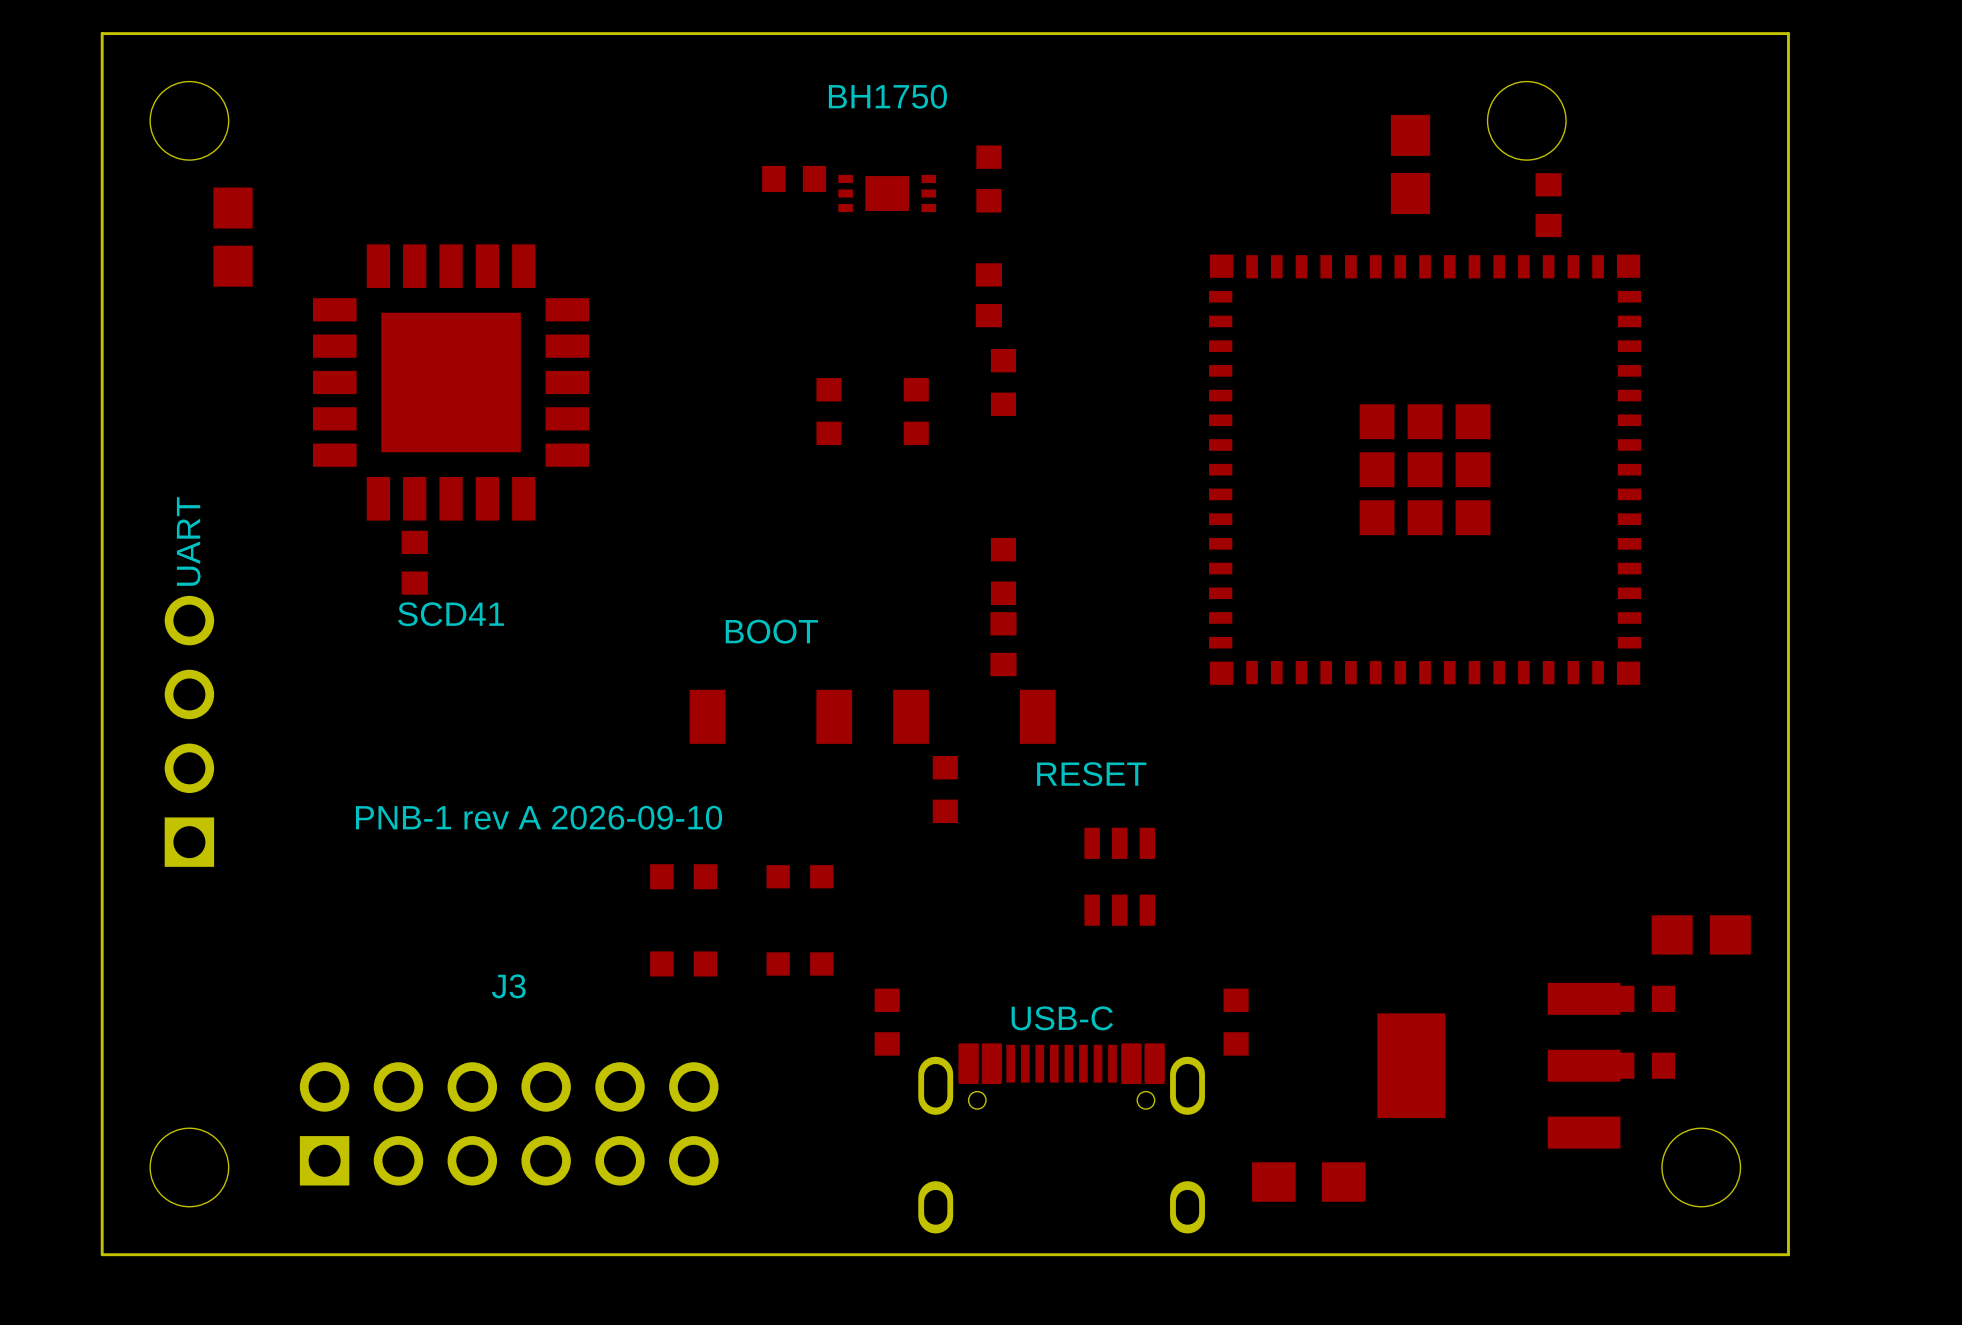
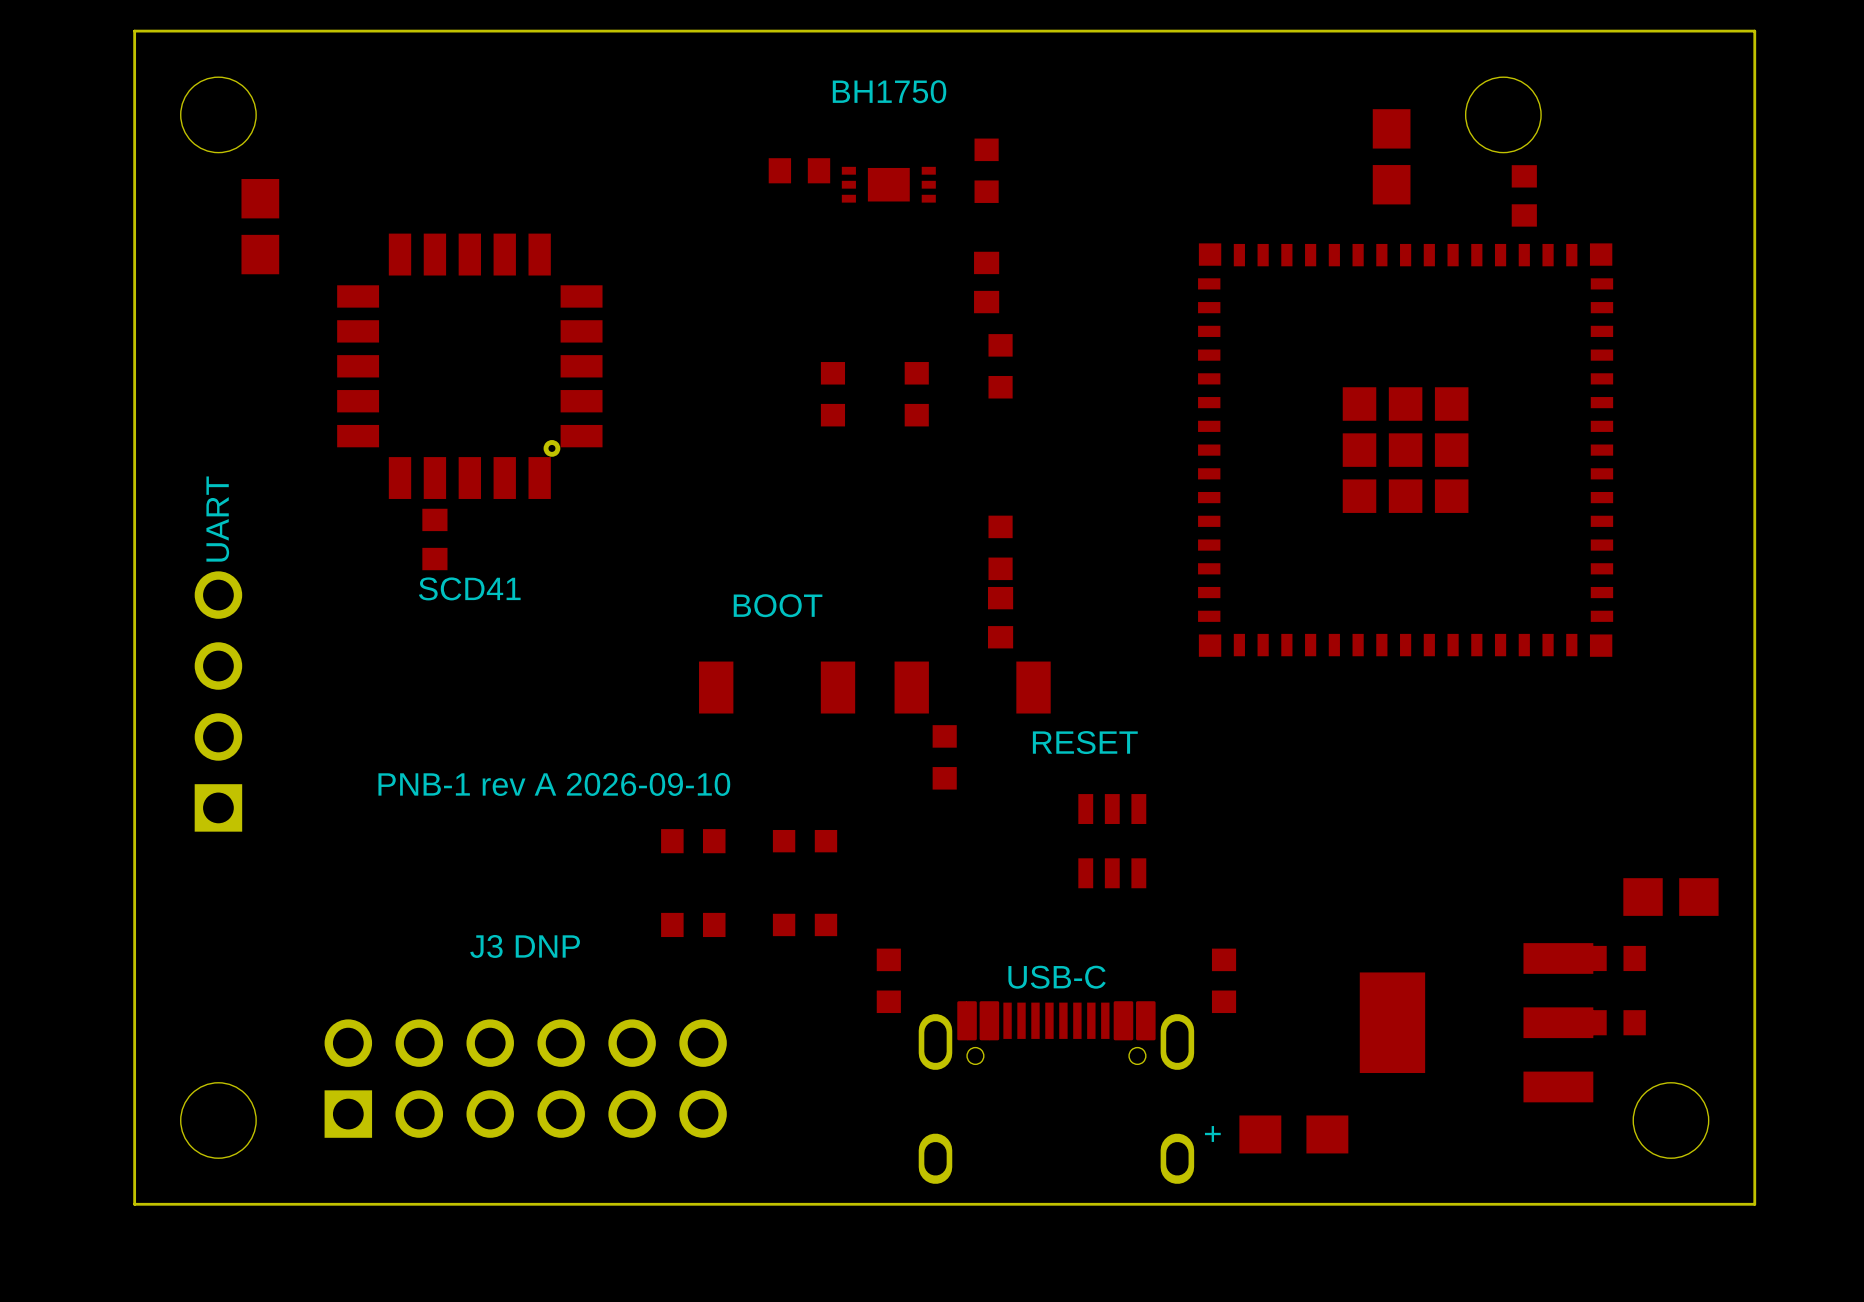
part footprint: [312, 244, 590, 521] -> [337, 233, 603, 499]
text: J3 (508, 986) -> J3 DNP (525, 946)
text: none -> + (1212, 1133)

